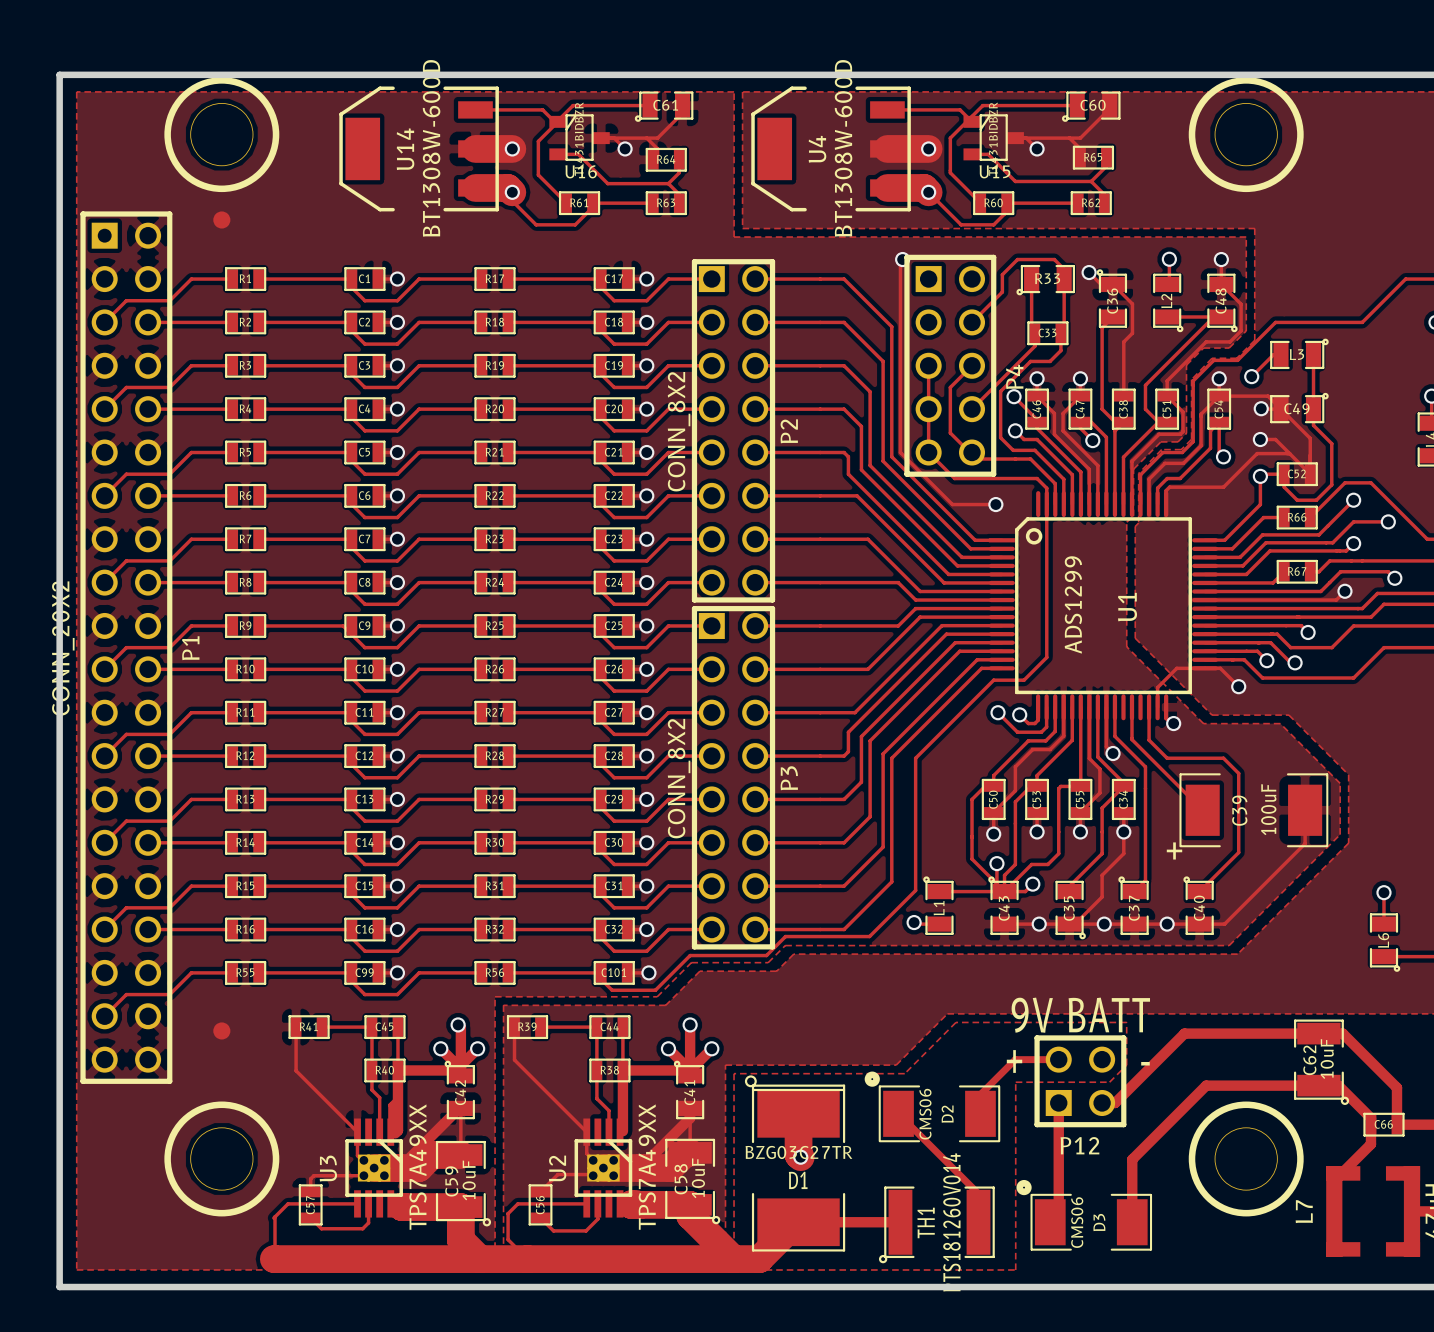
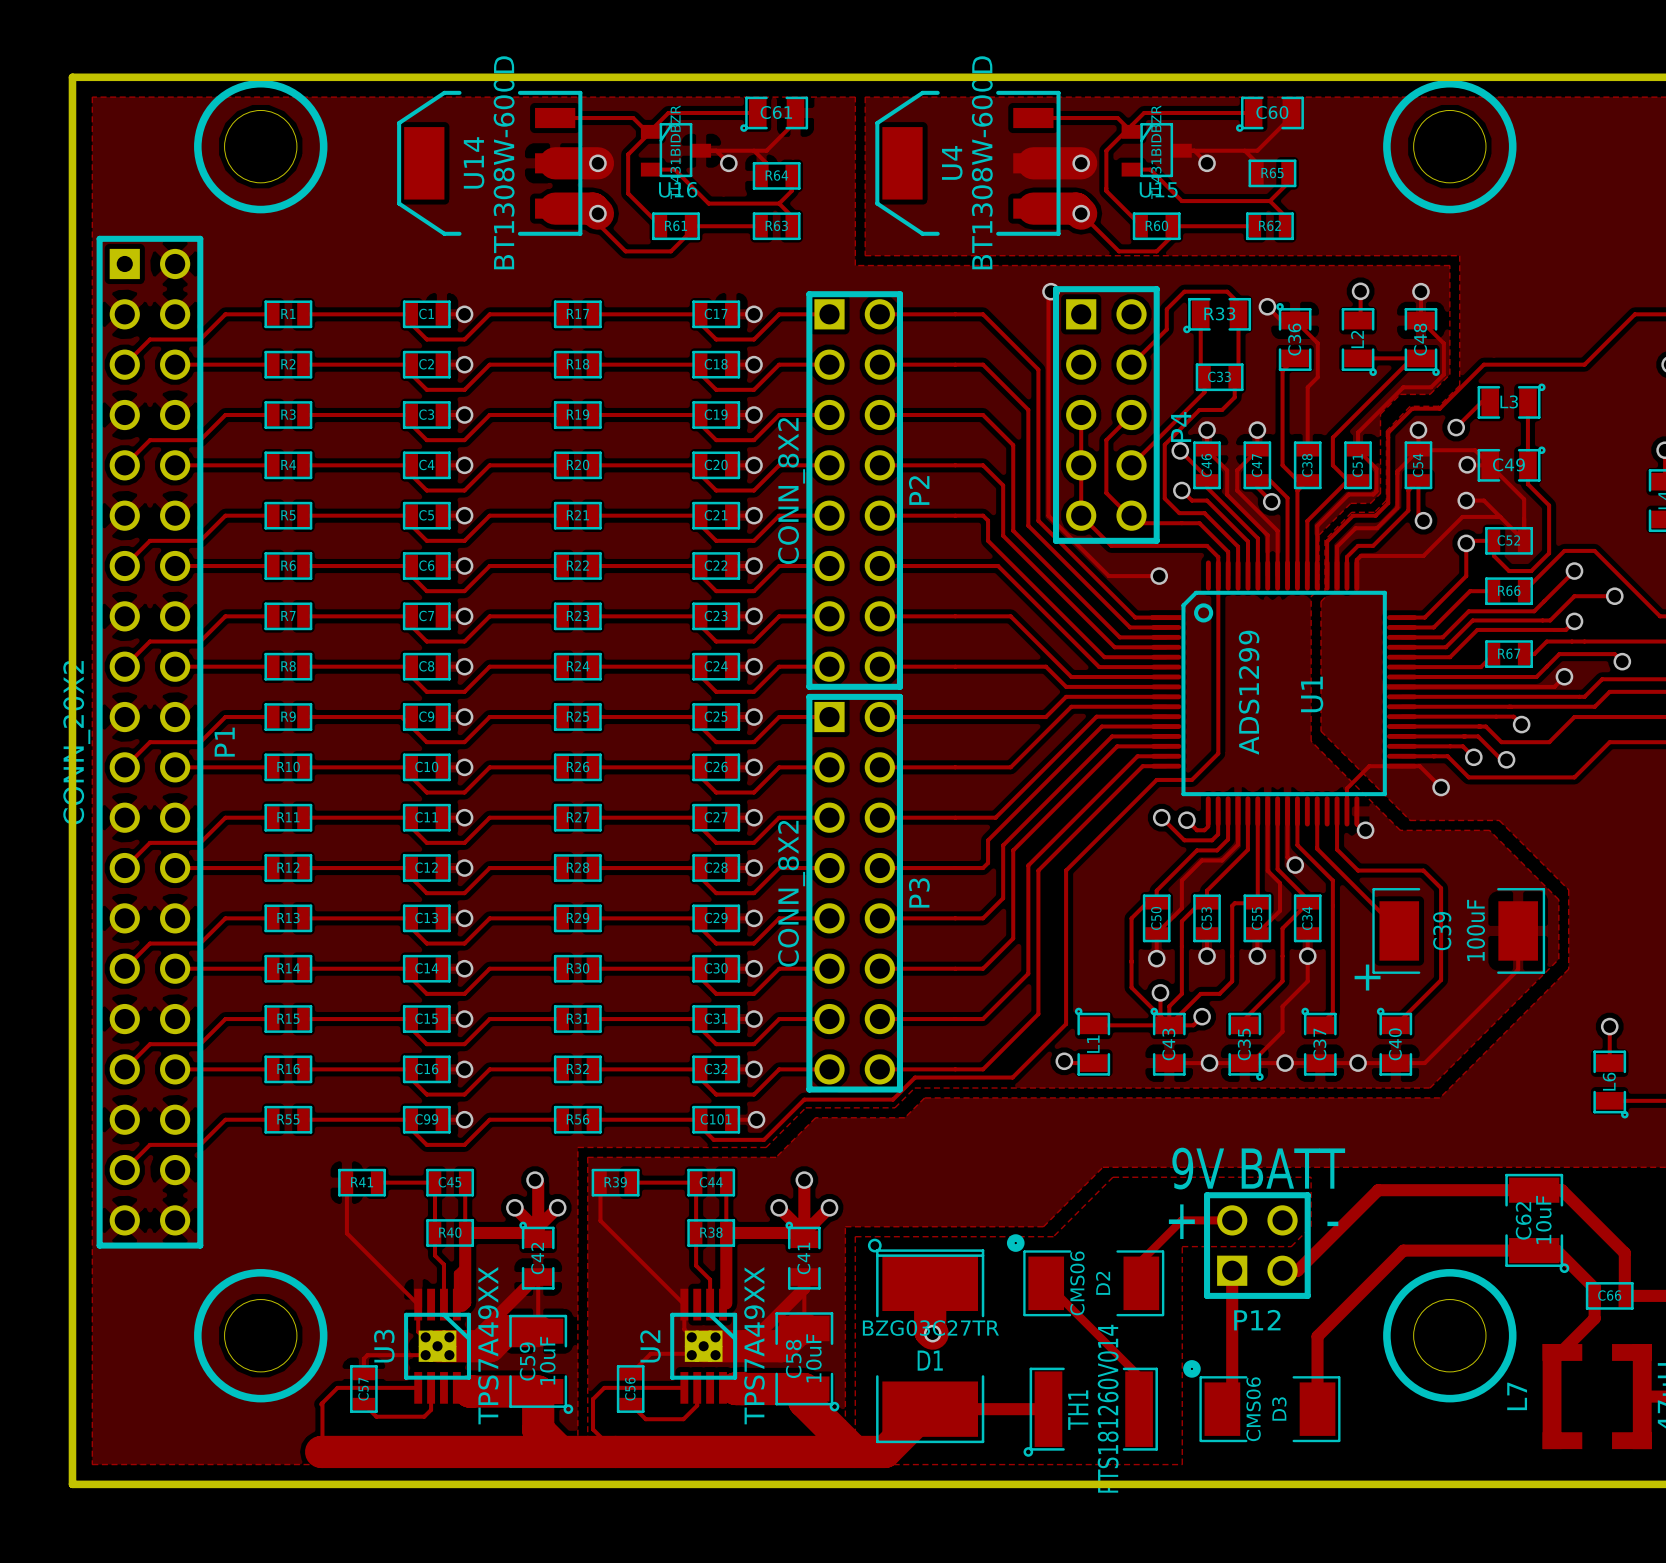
part: (221, 219) -> none
part: (221, 1030) -> none

